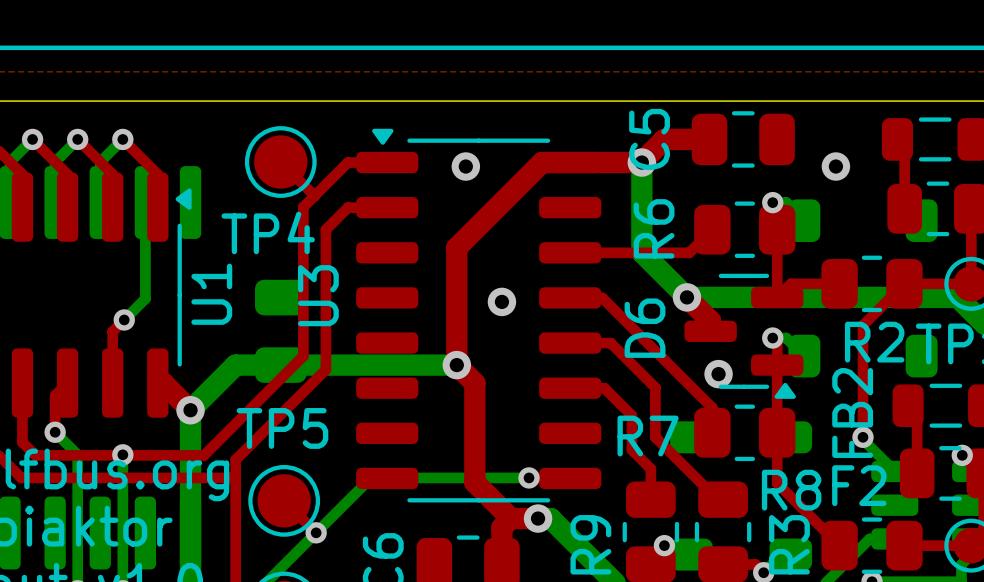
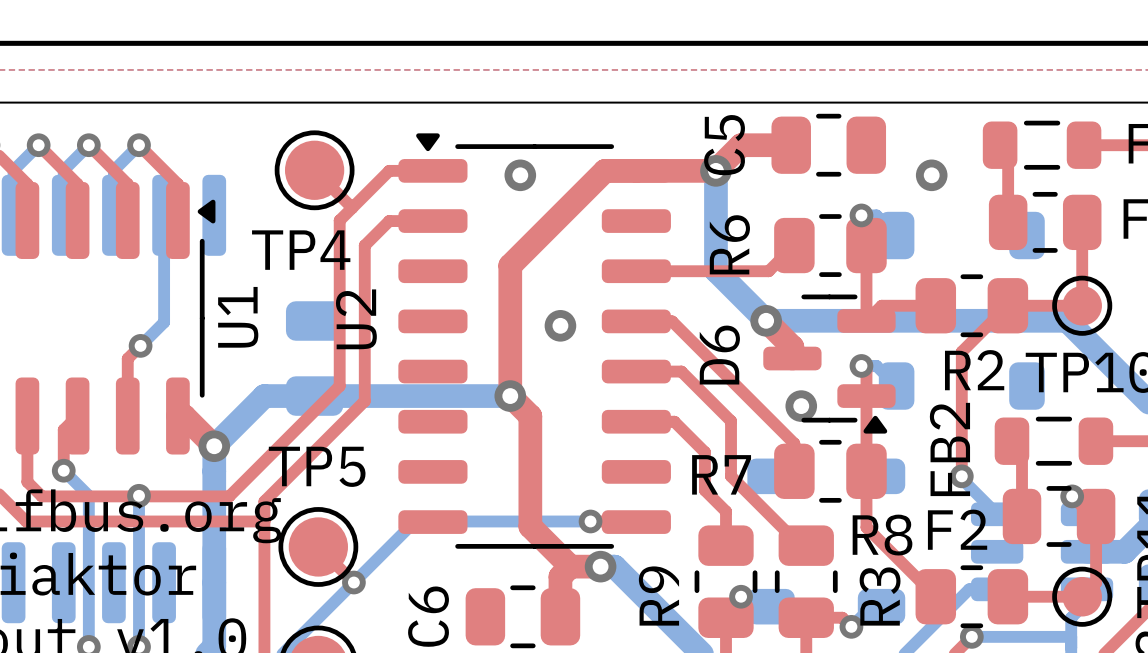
U3 name: U3 (318, 295) -> U2 (356, 319)

